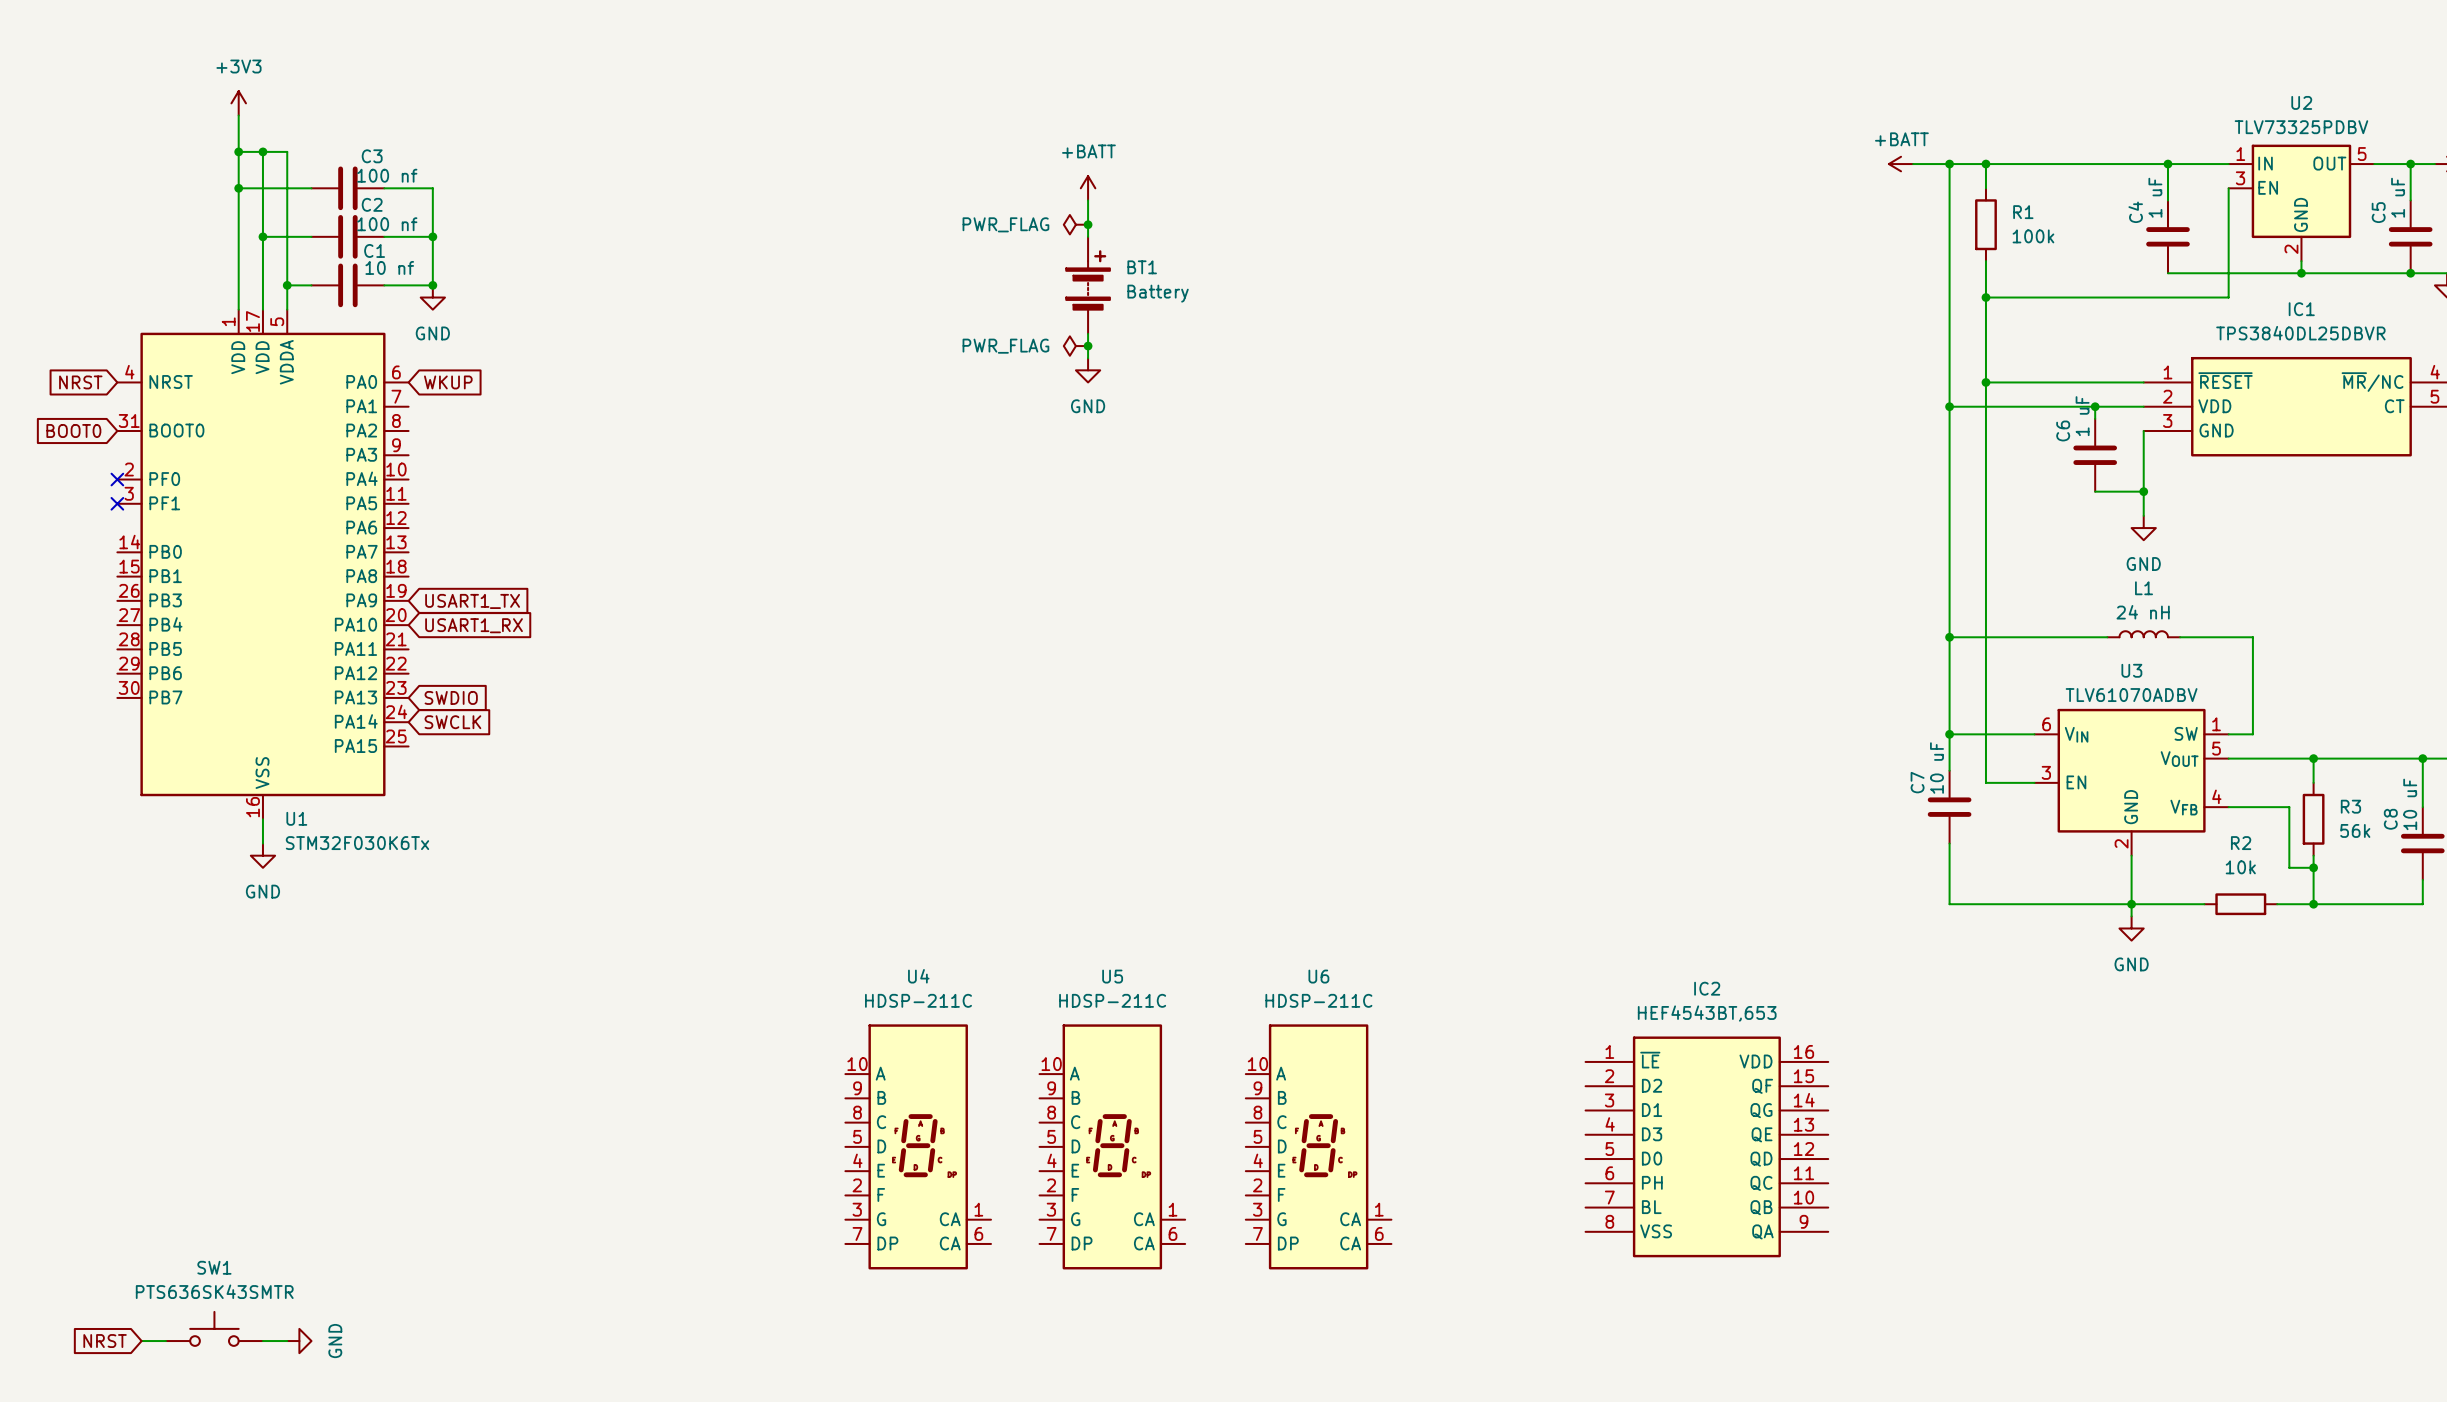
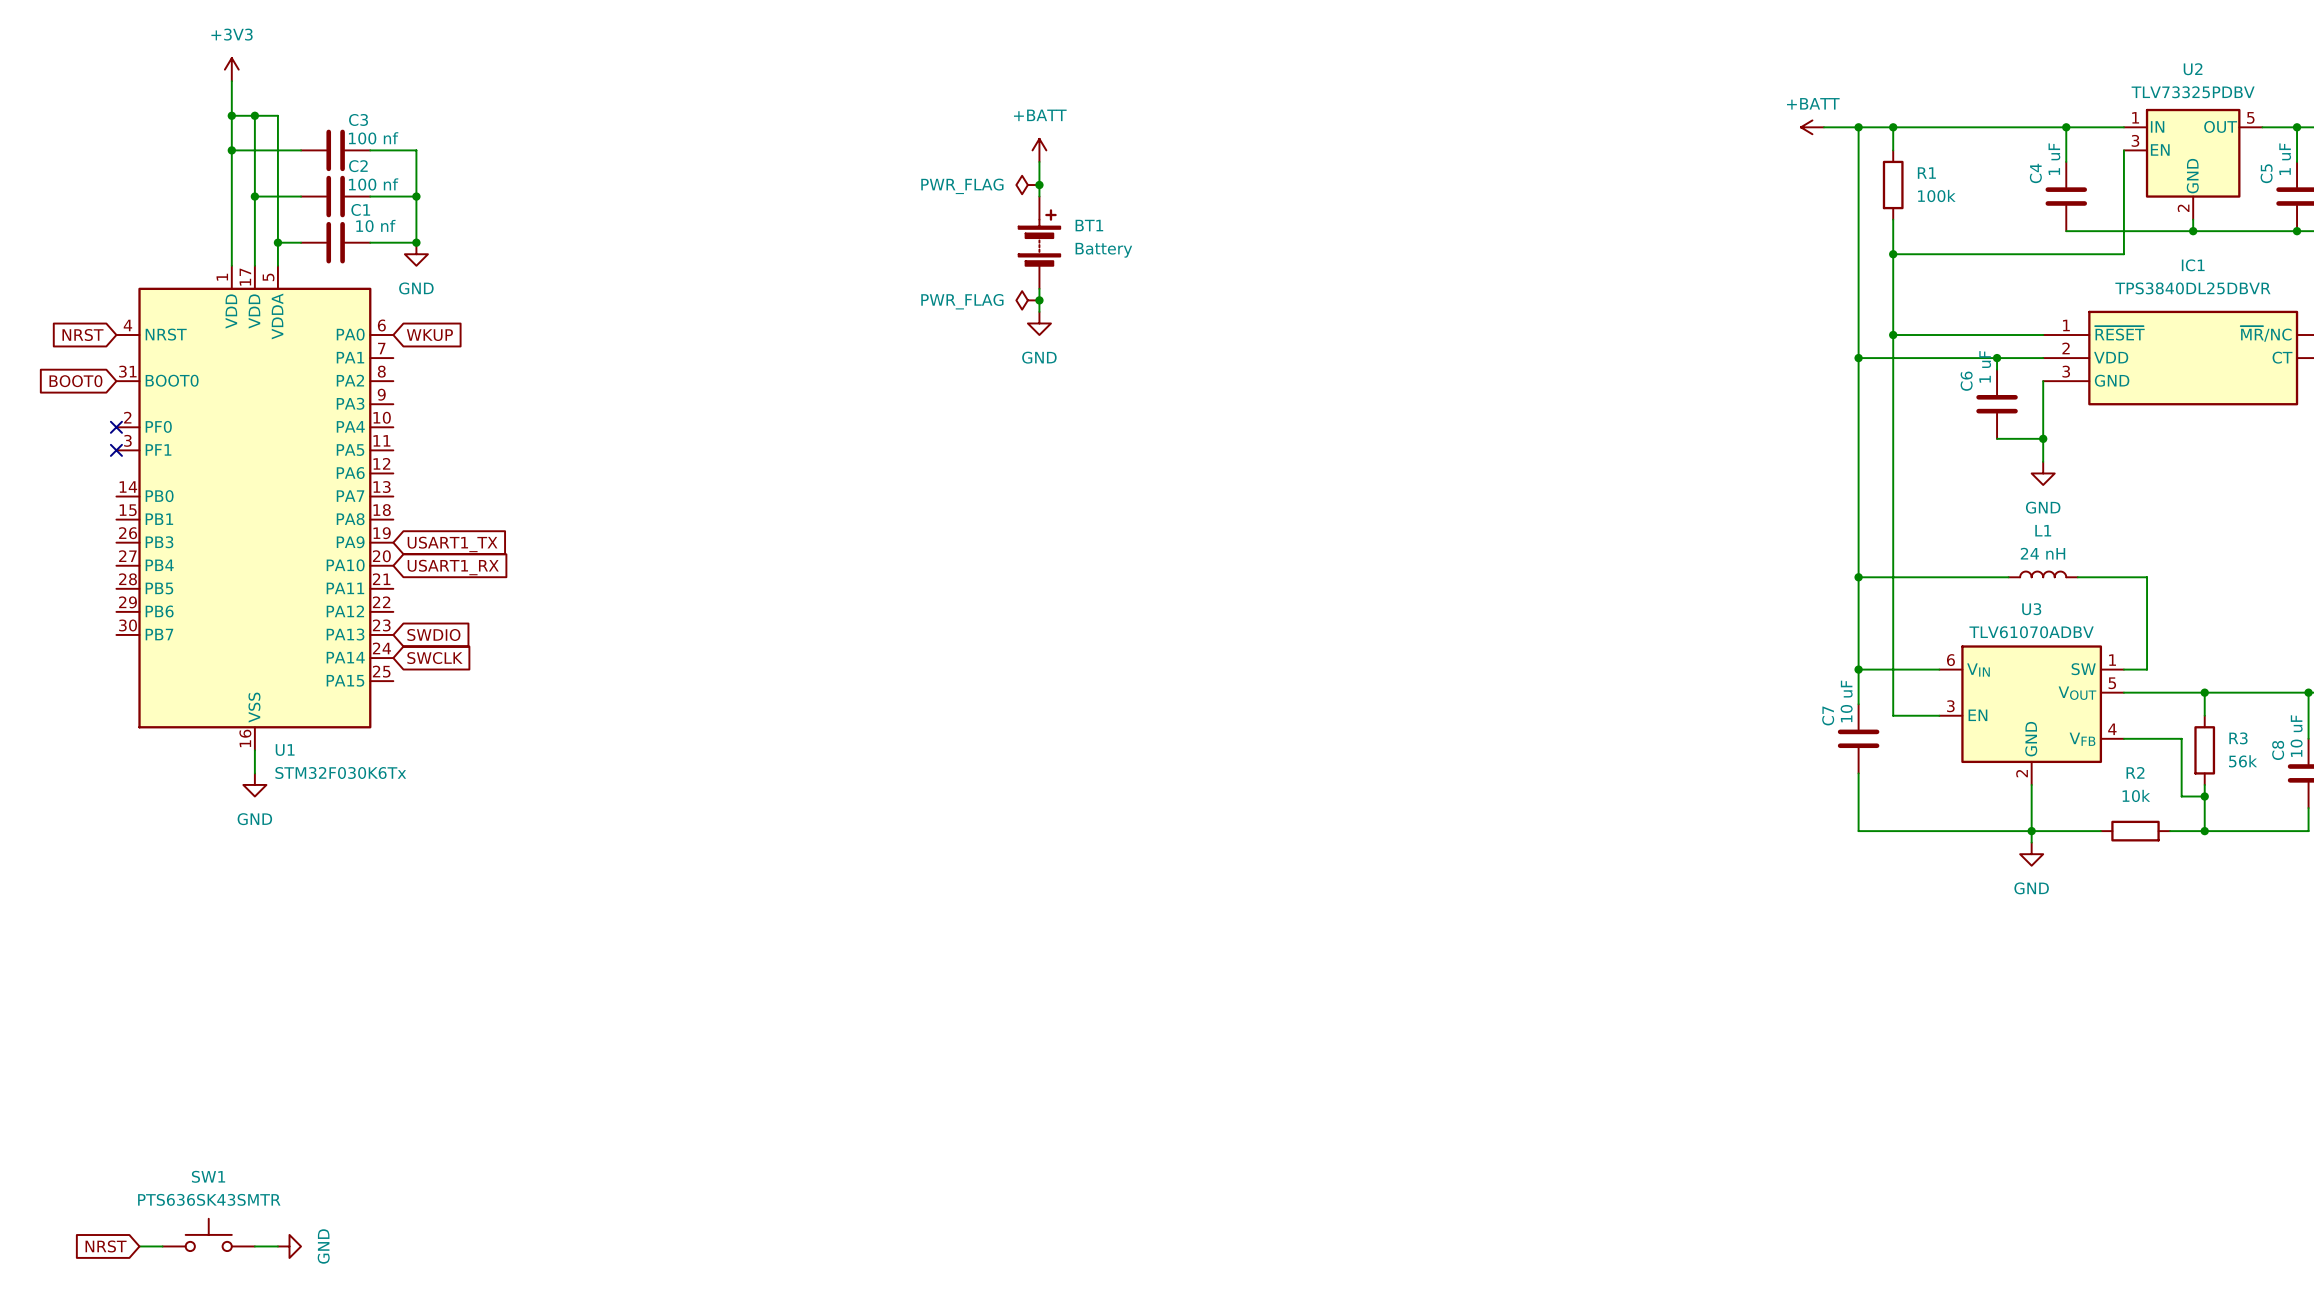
U4: HDSP-211C (918, 1146) -> none
U5: HDSP-211C (1112, 1146) -> none
U6: HDSP-211C (1318, 1146) -> none
IC2: HEF4543BT,653 (1706, 1146) -> none

